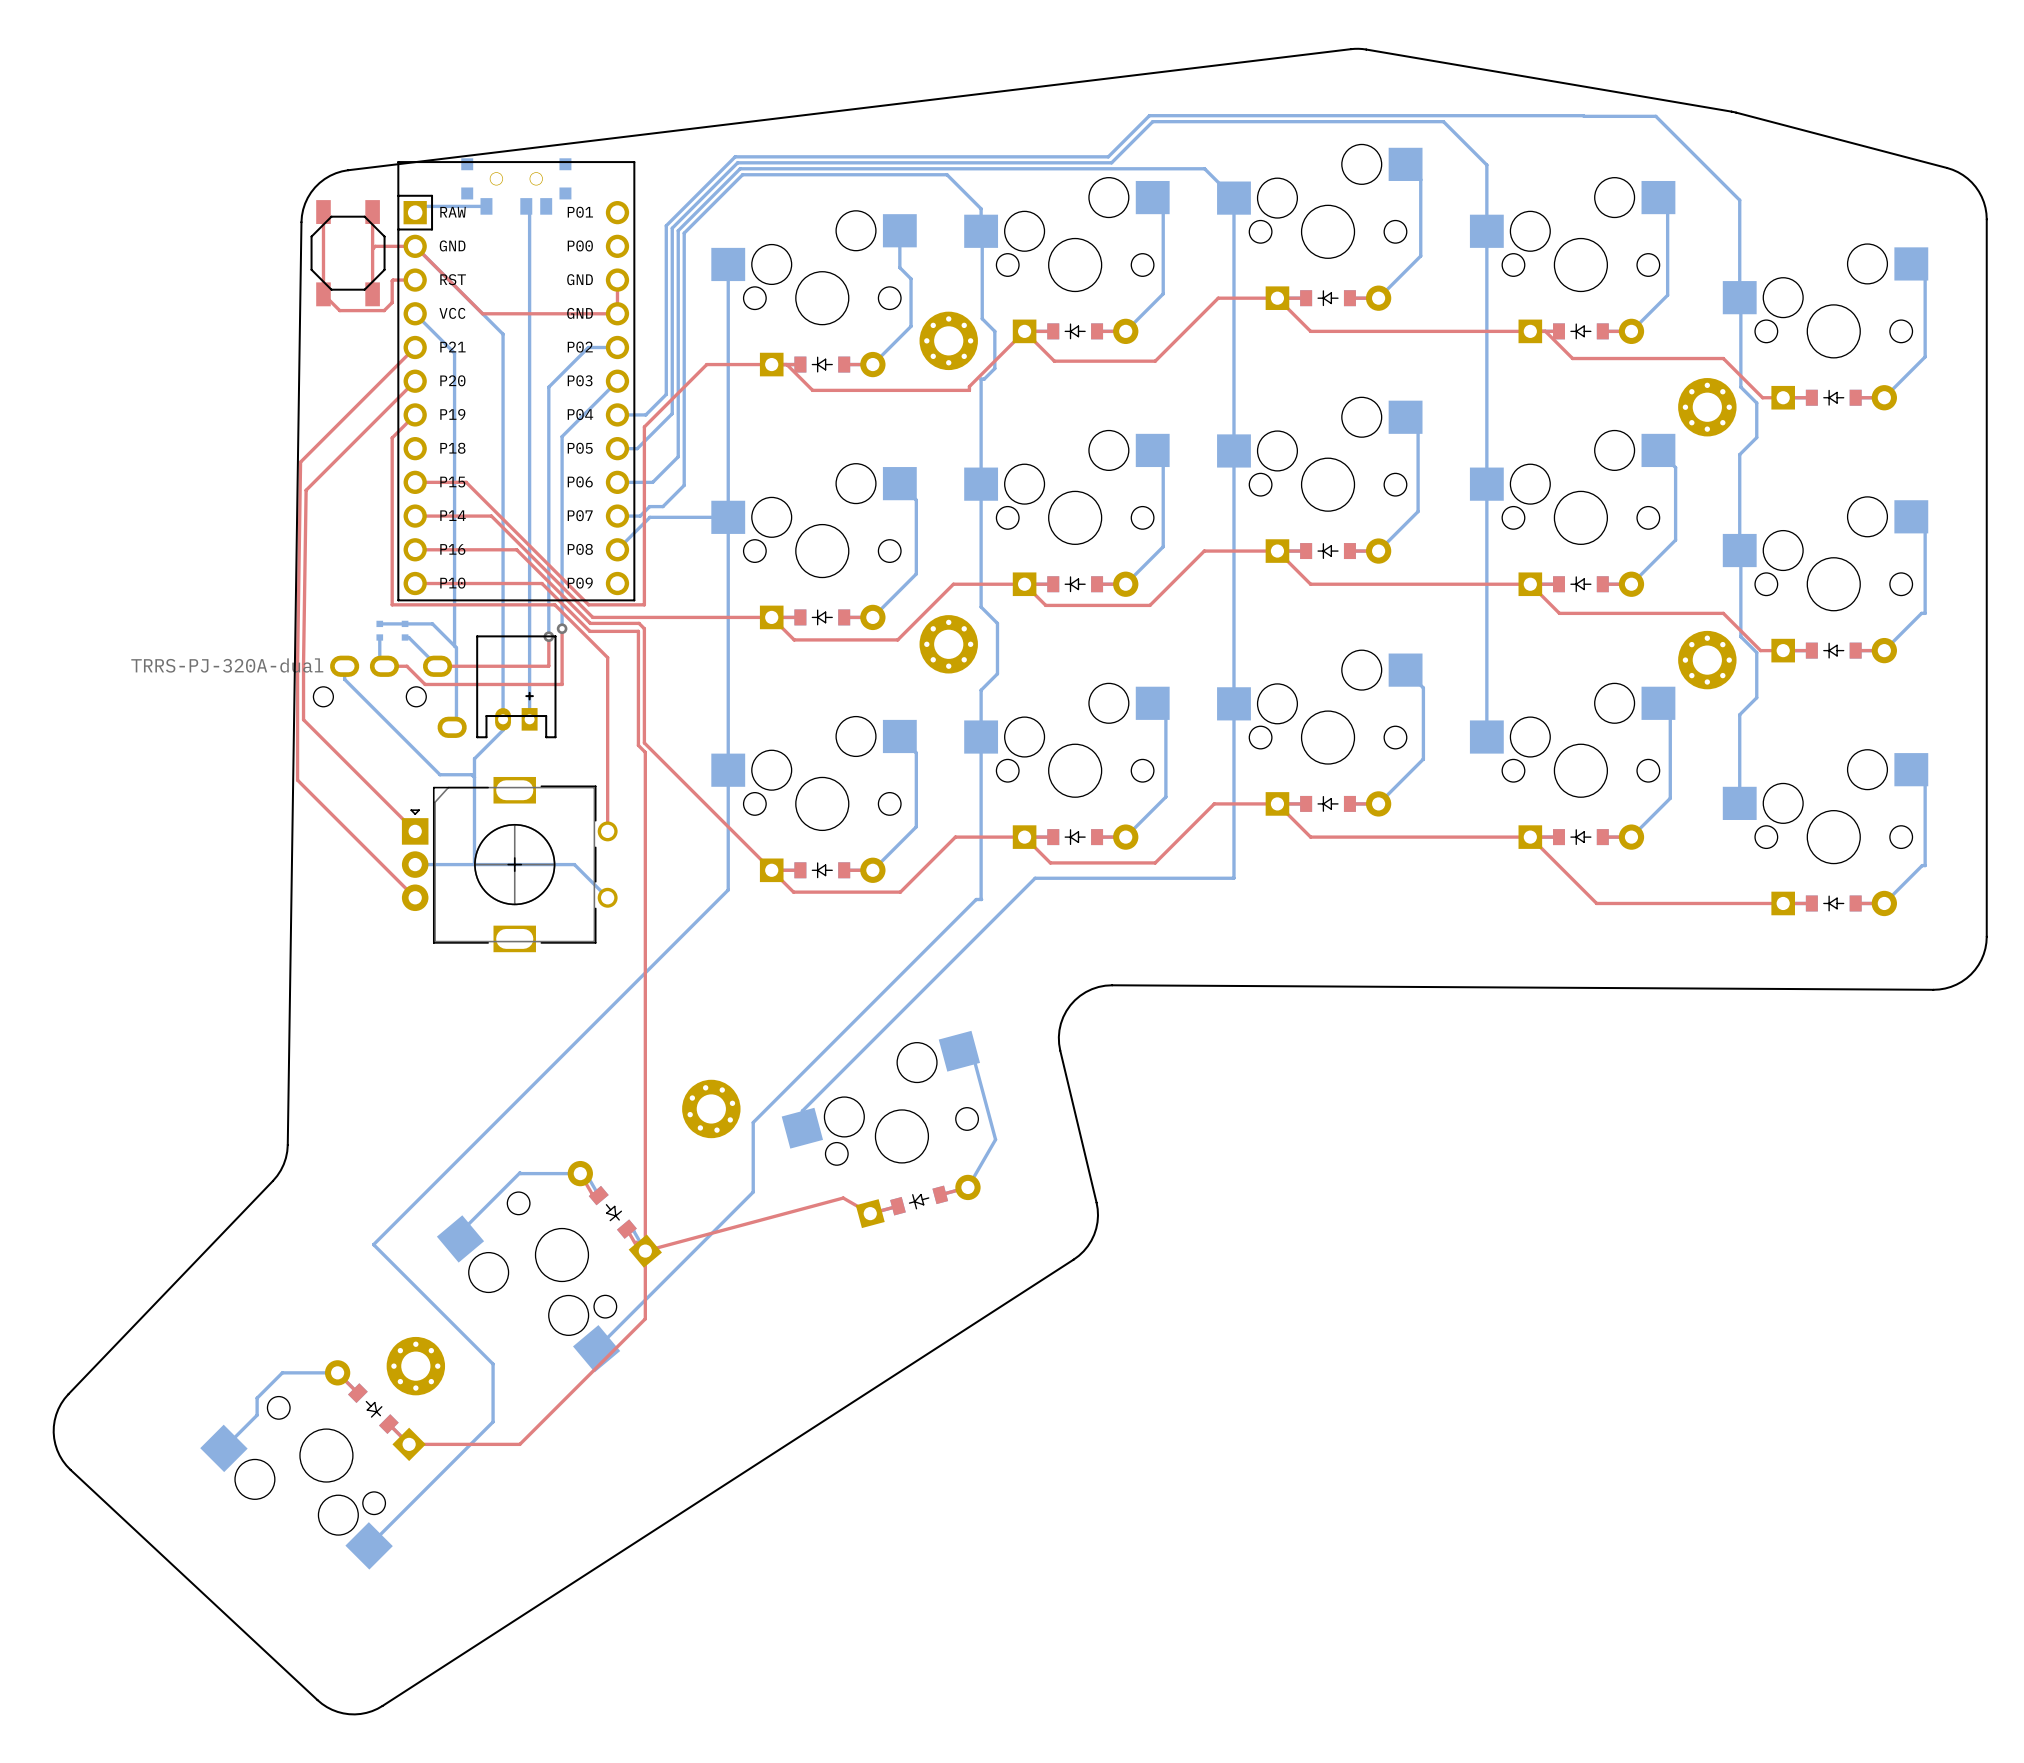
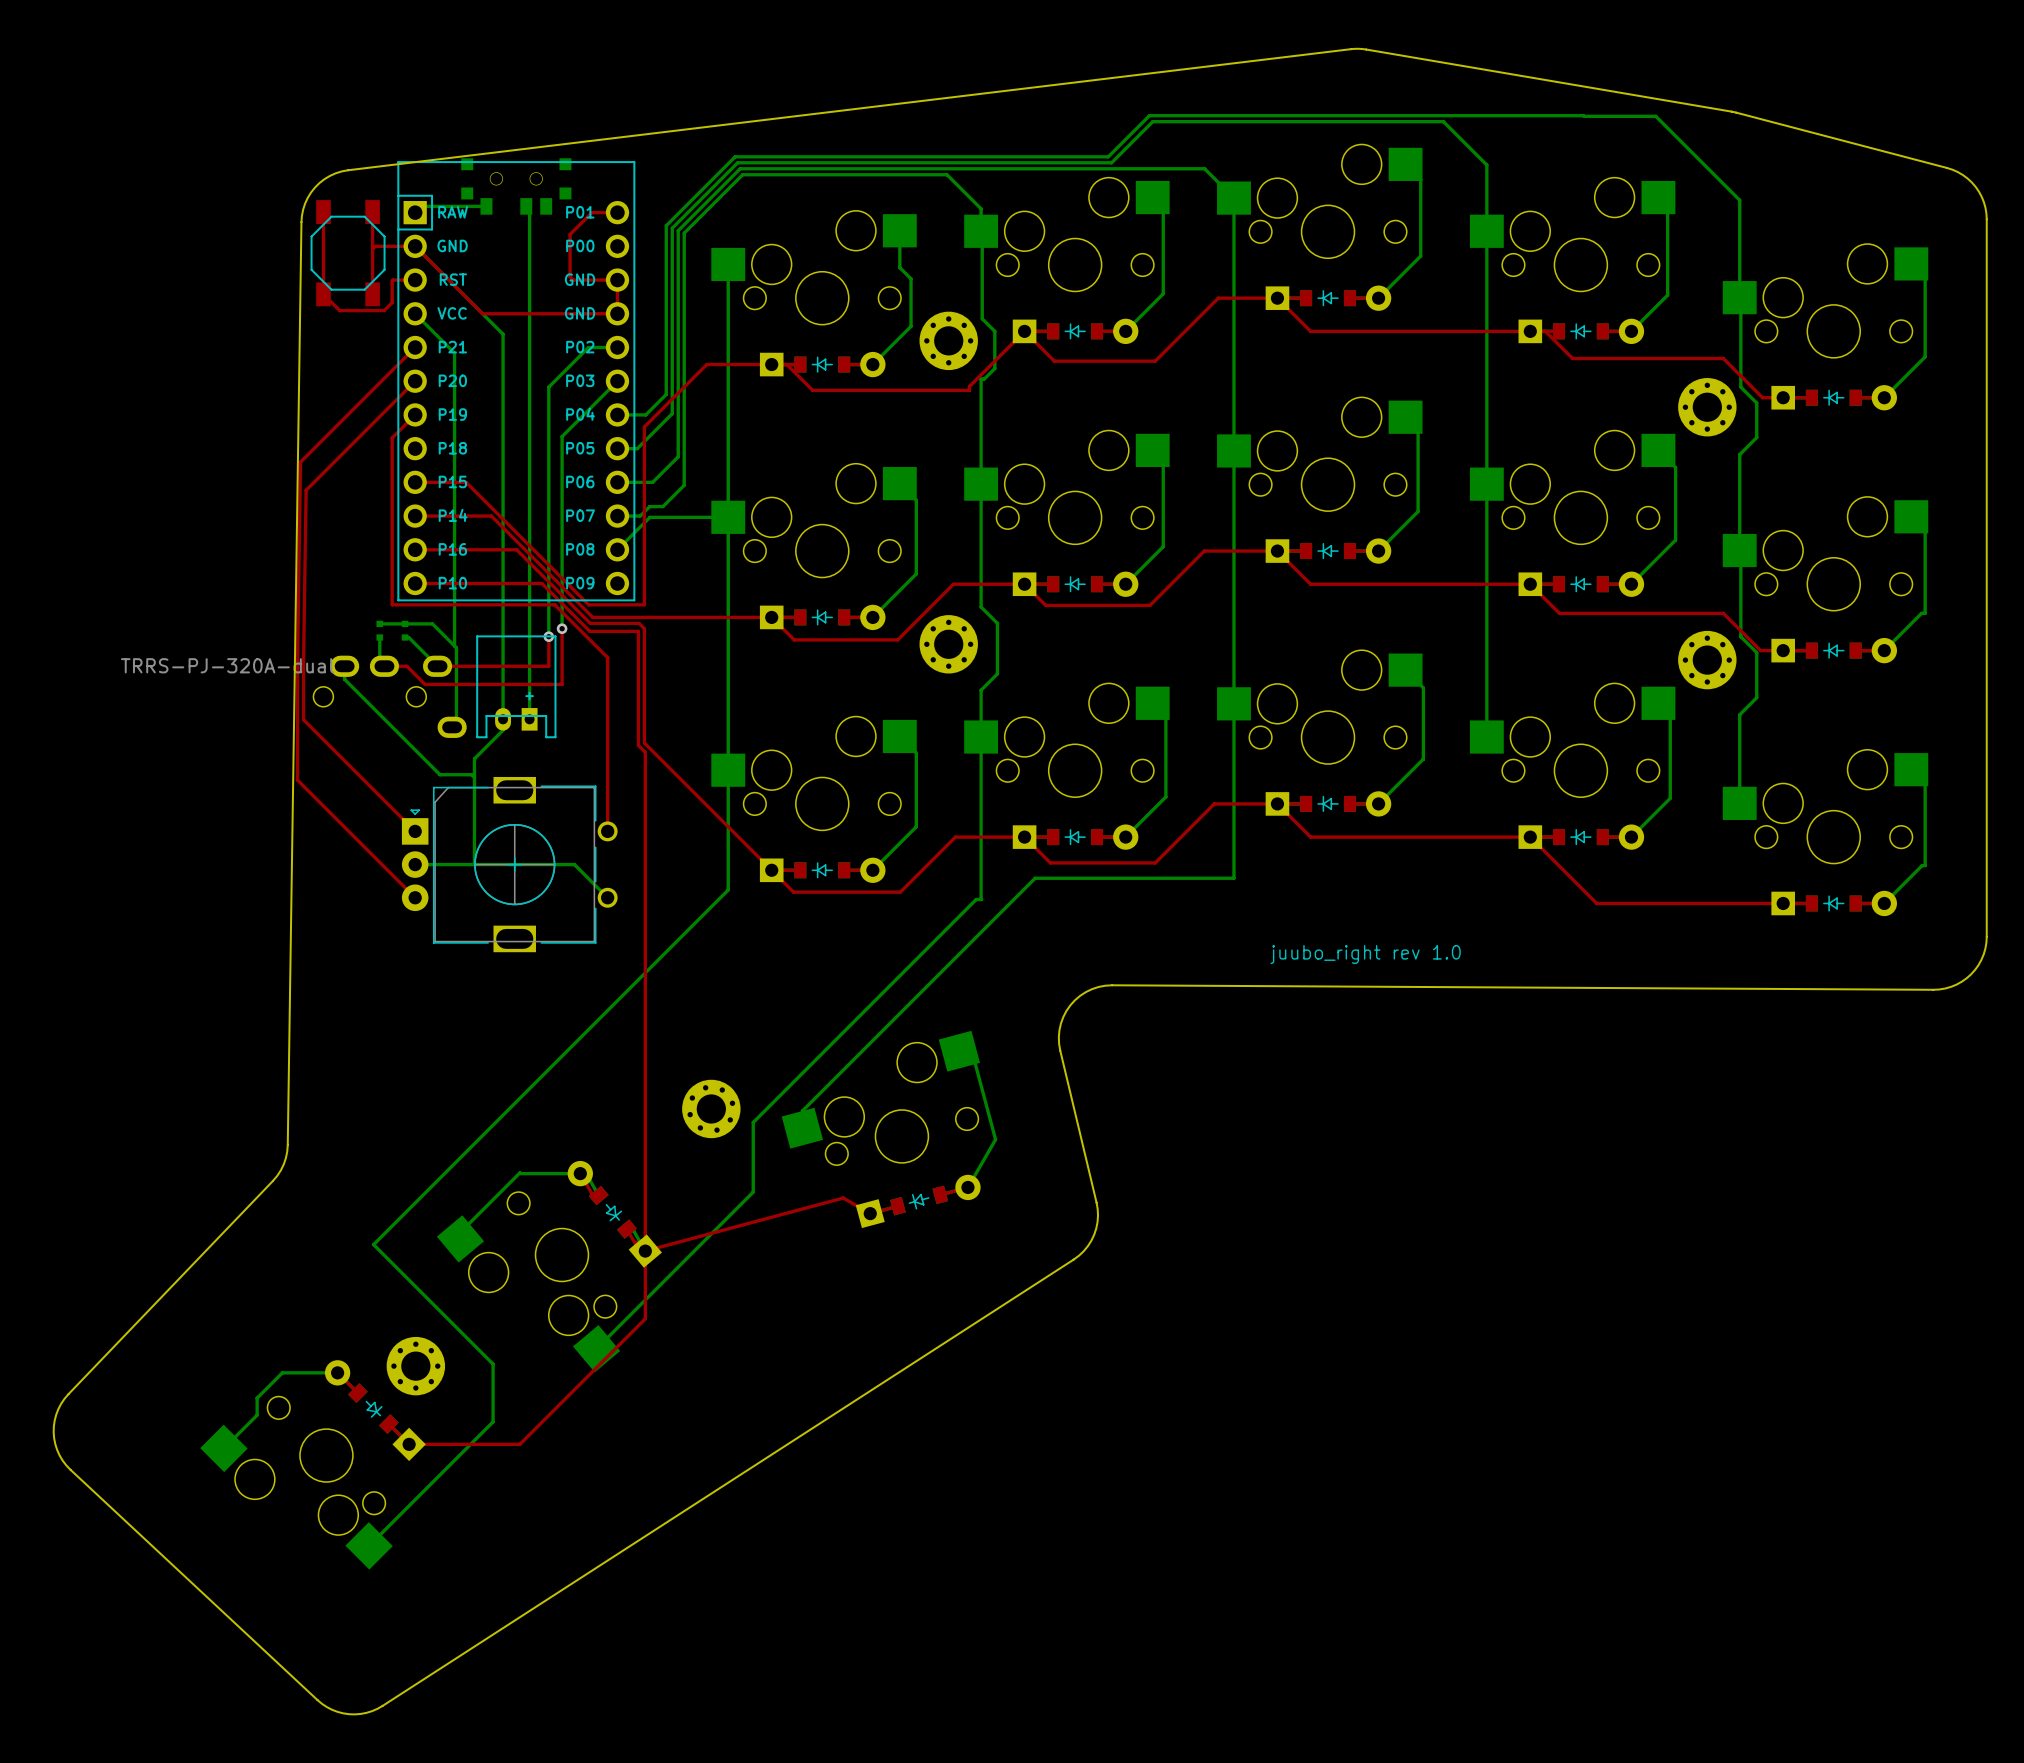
top track: none -> (617, 212) (591, 212) (570, 234) (568, 275) (573, 280) (617, 280)
text: none -> juubo_right rev 1.0 (1365, 954)

